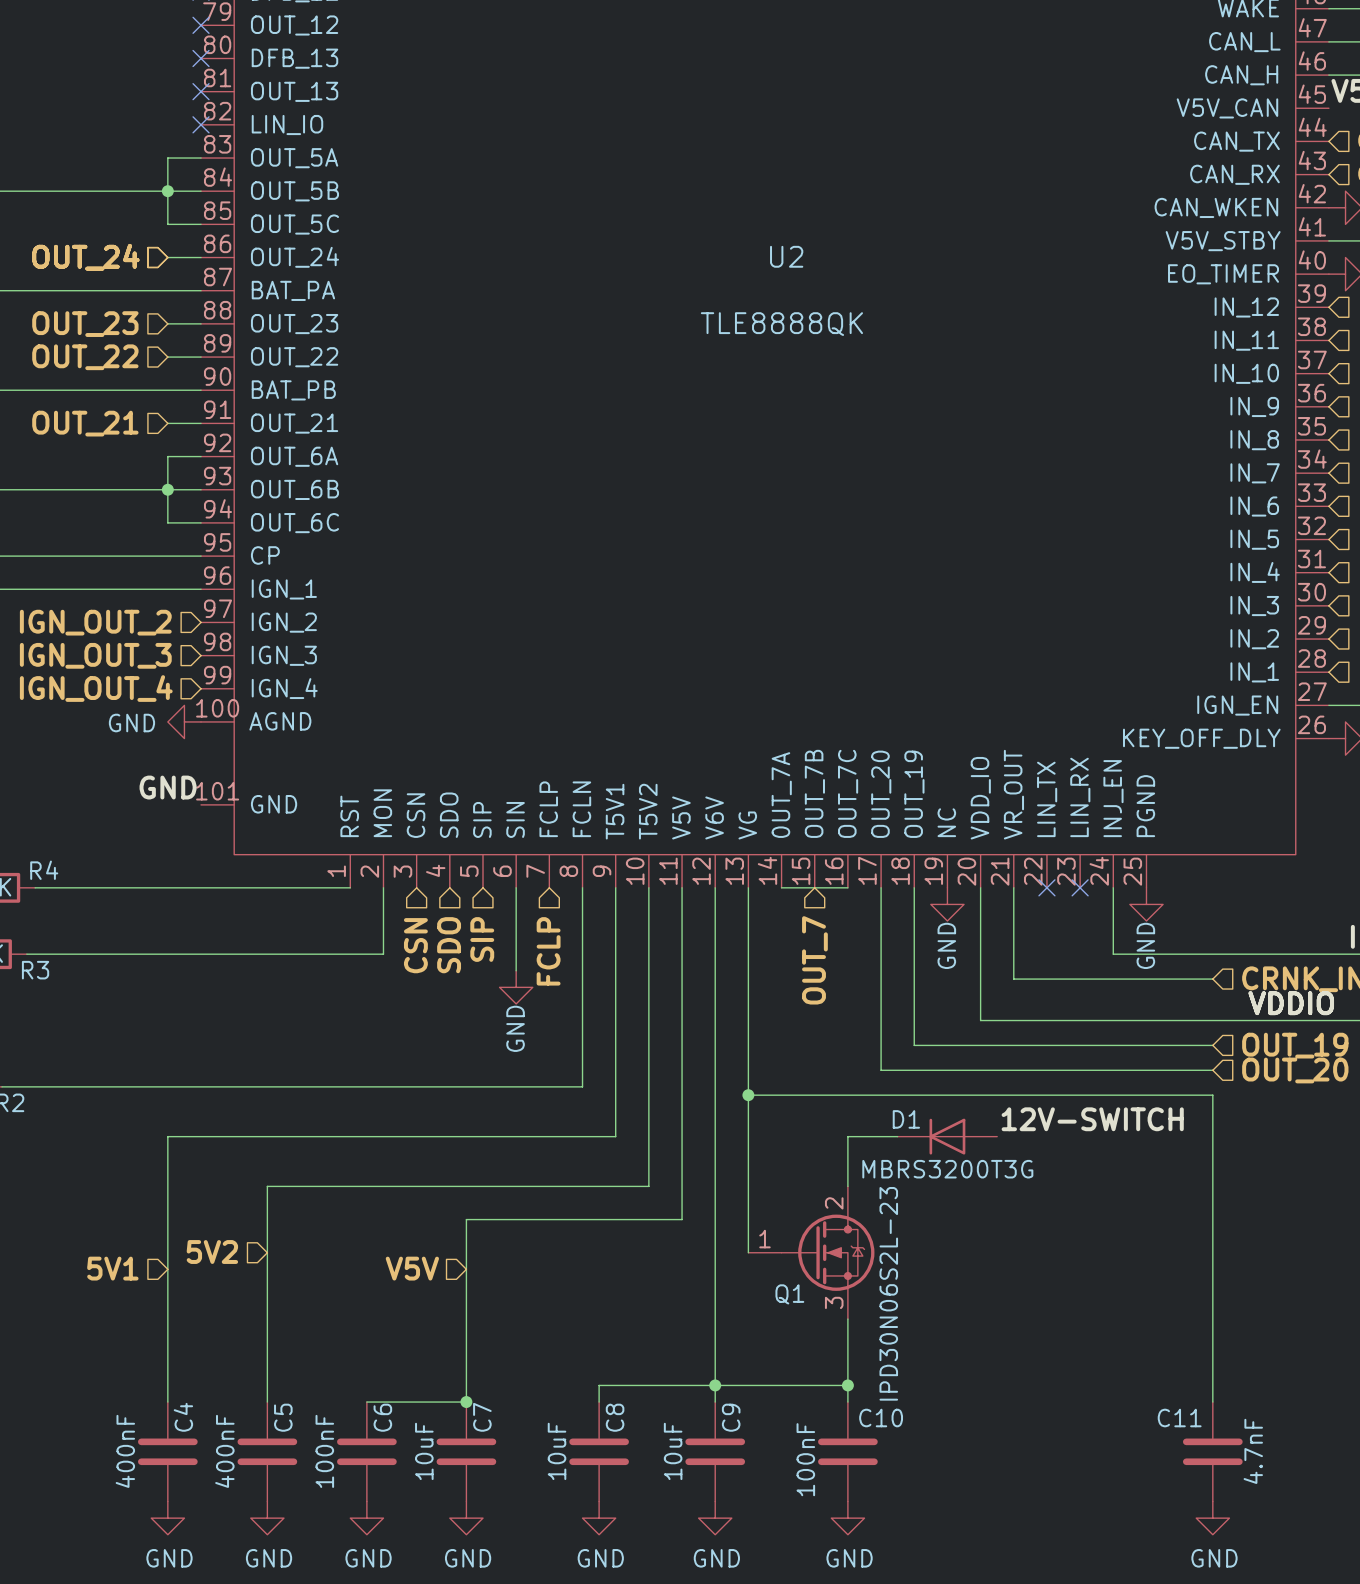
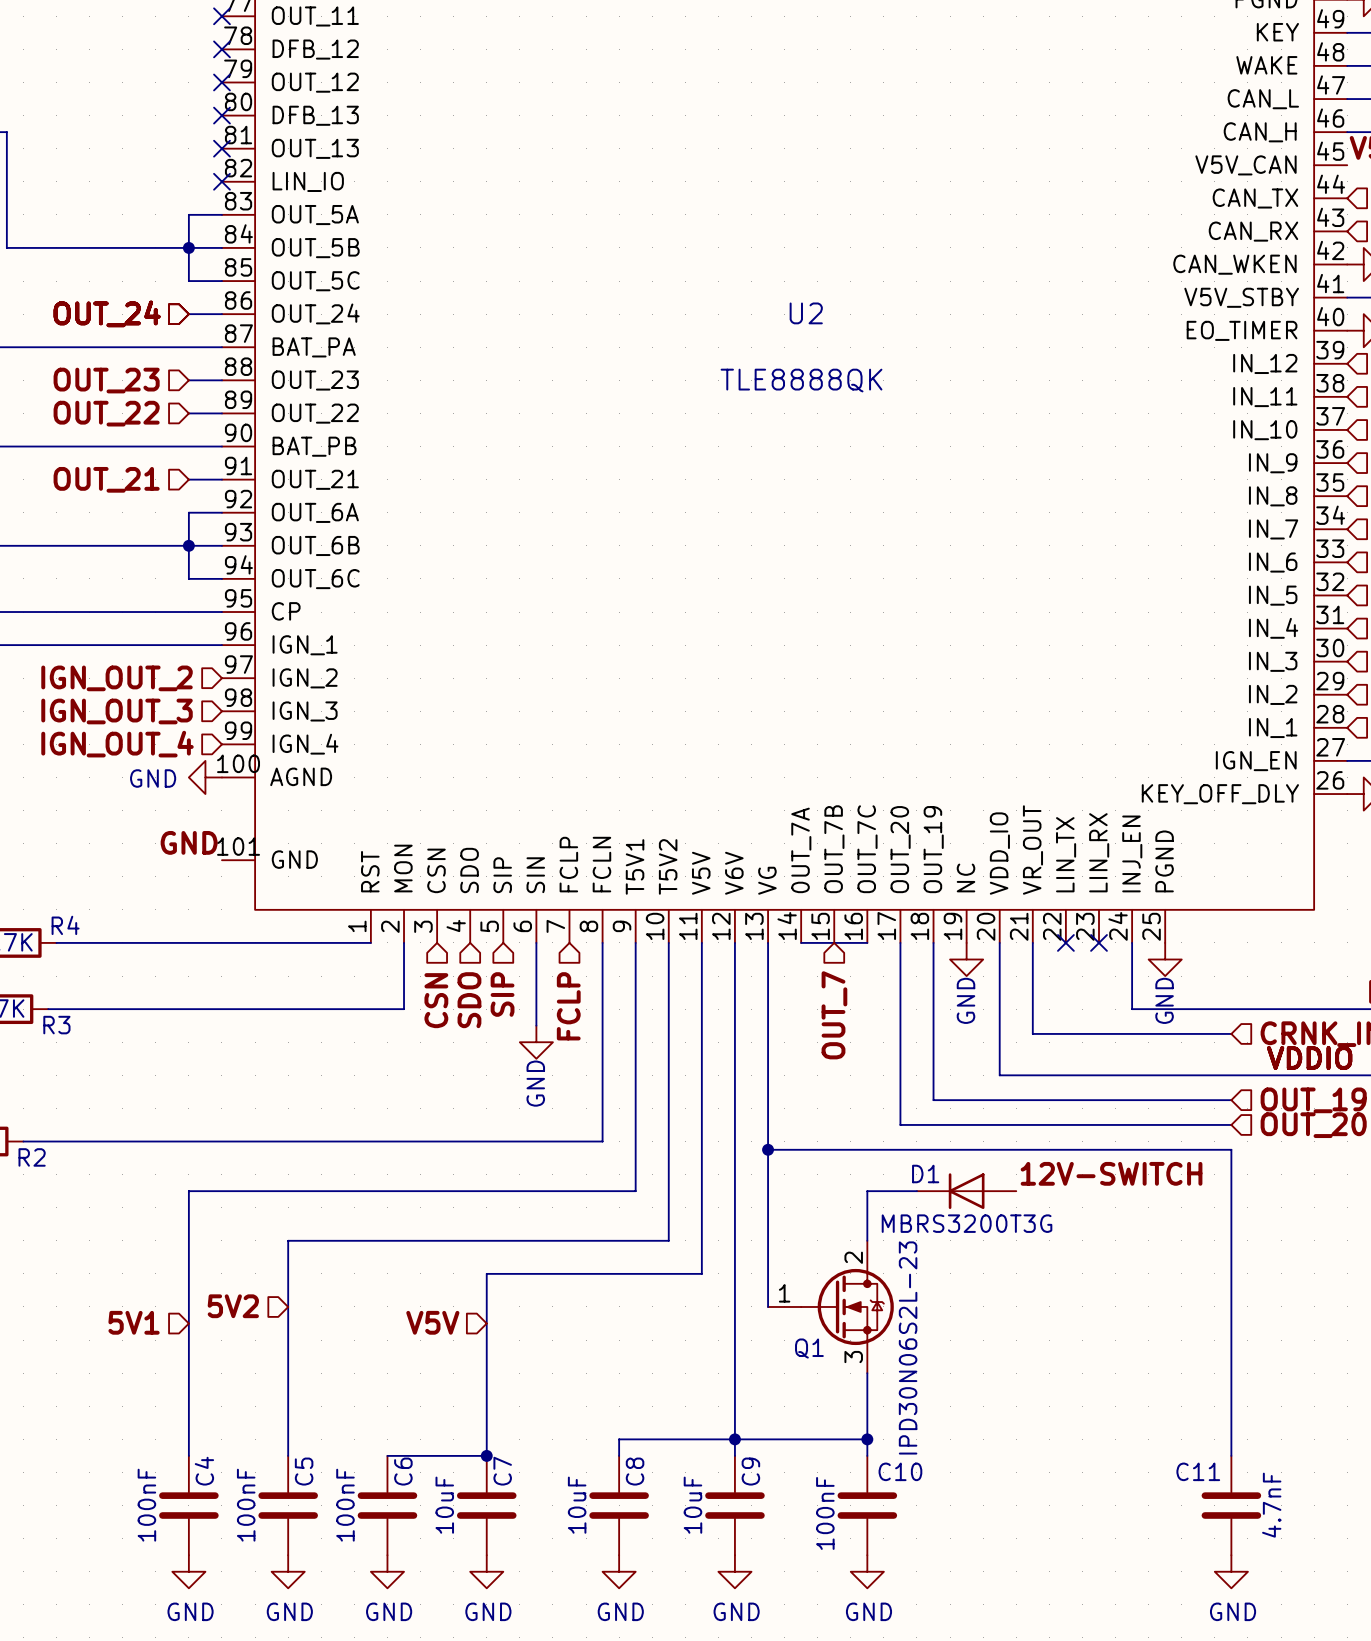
C4 value: 400nF (125, 1451) -> 100nF (146, 1505)
C5 value: 400nF (224, 1451) -> 100nF (246, 1505)

